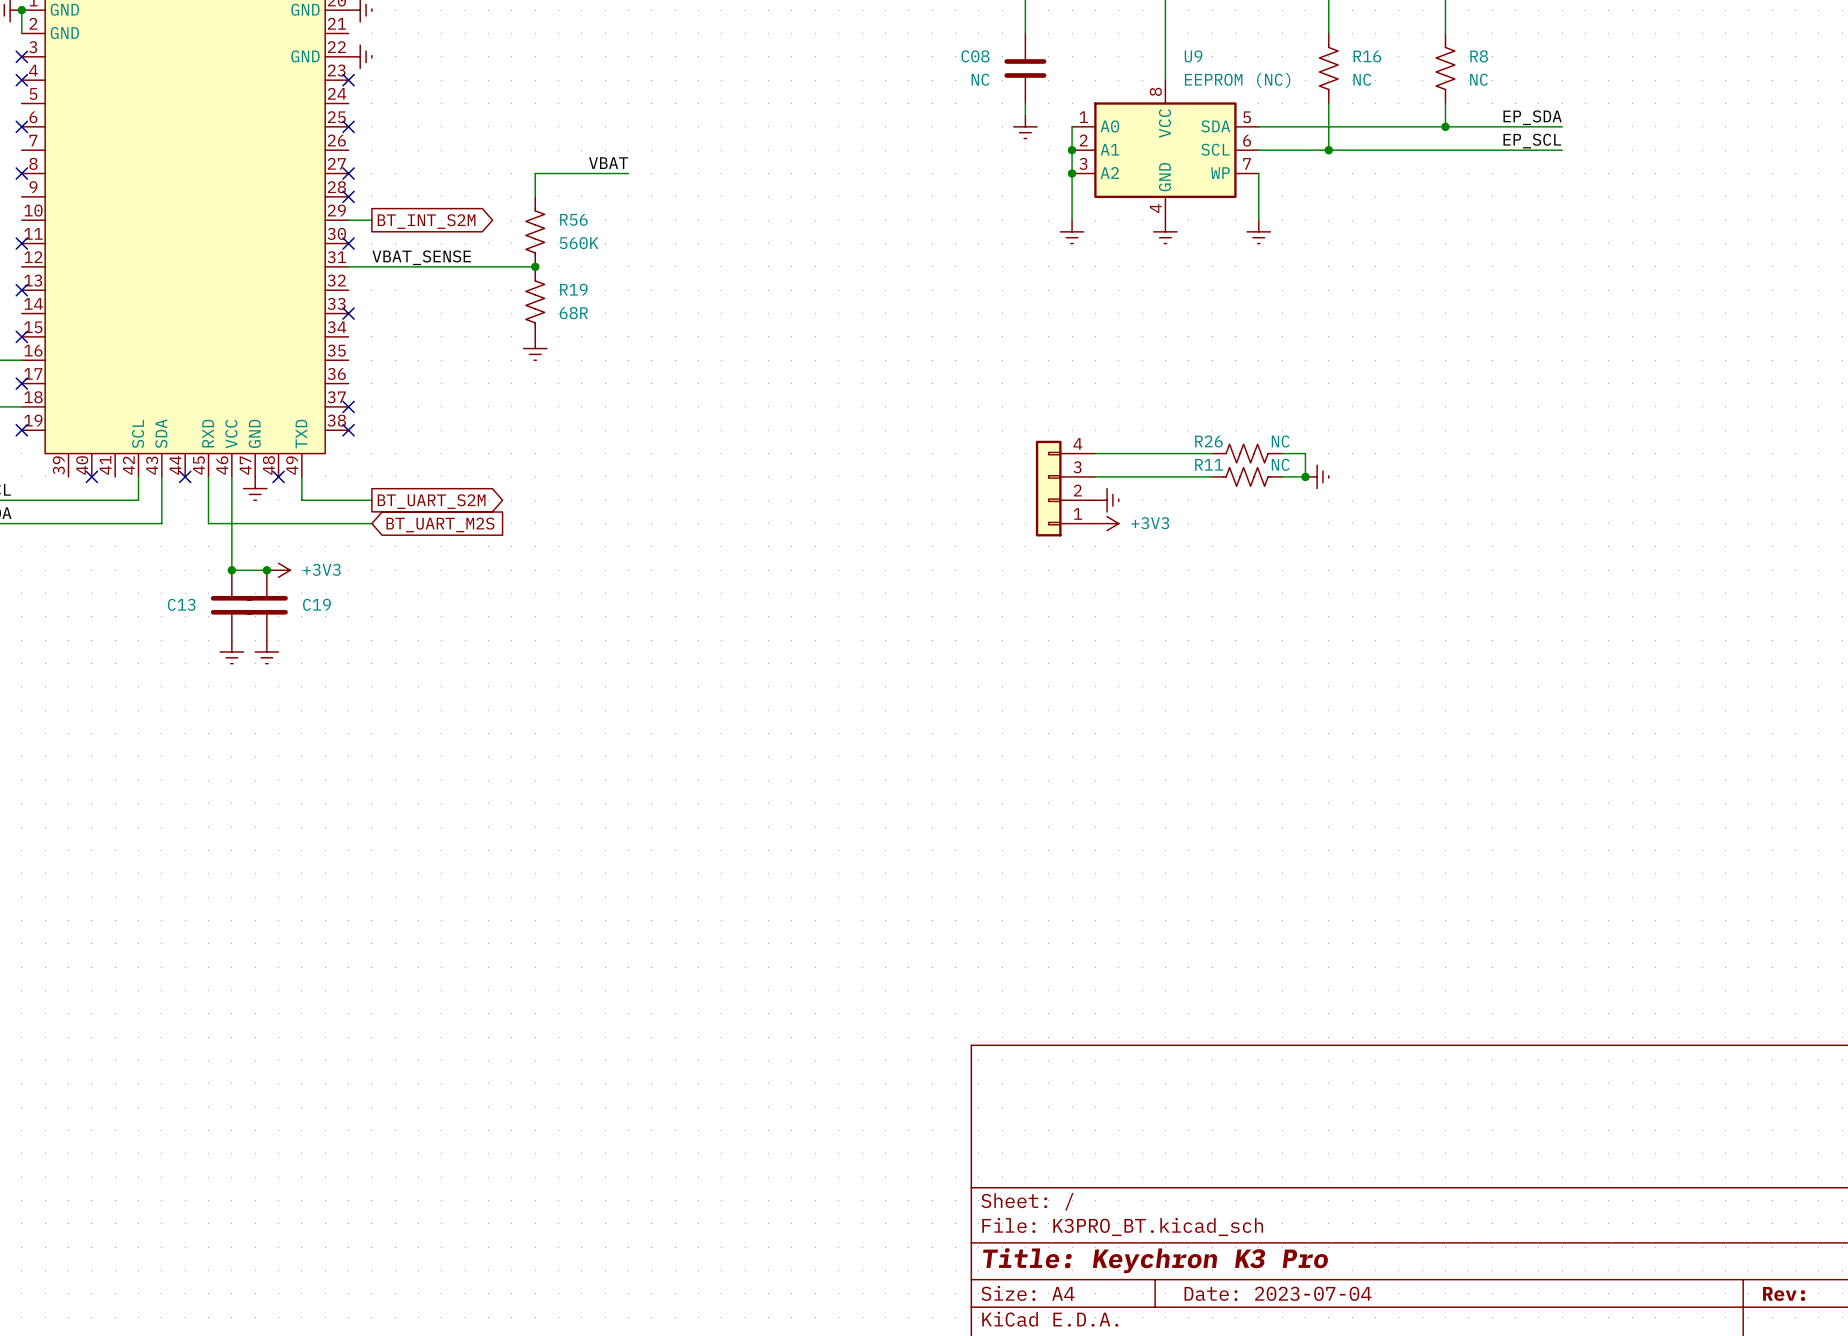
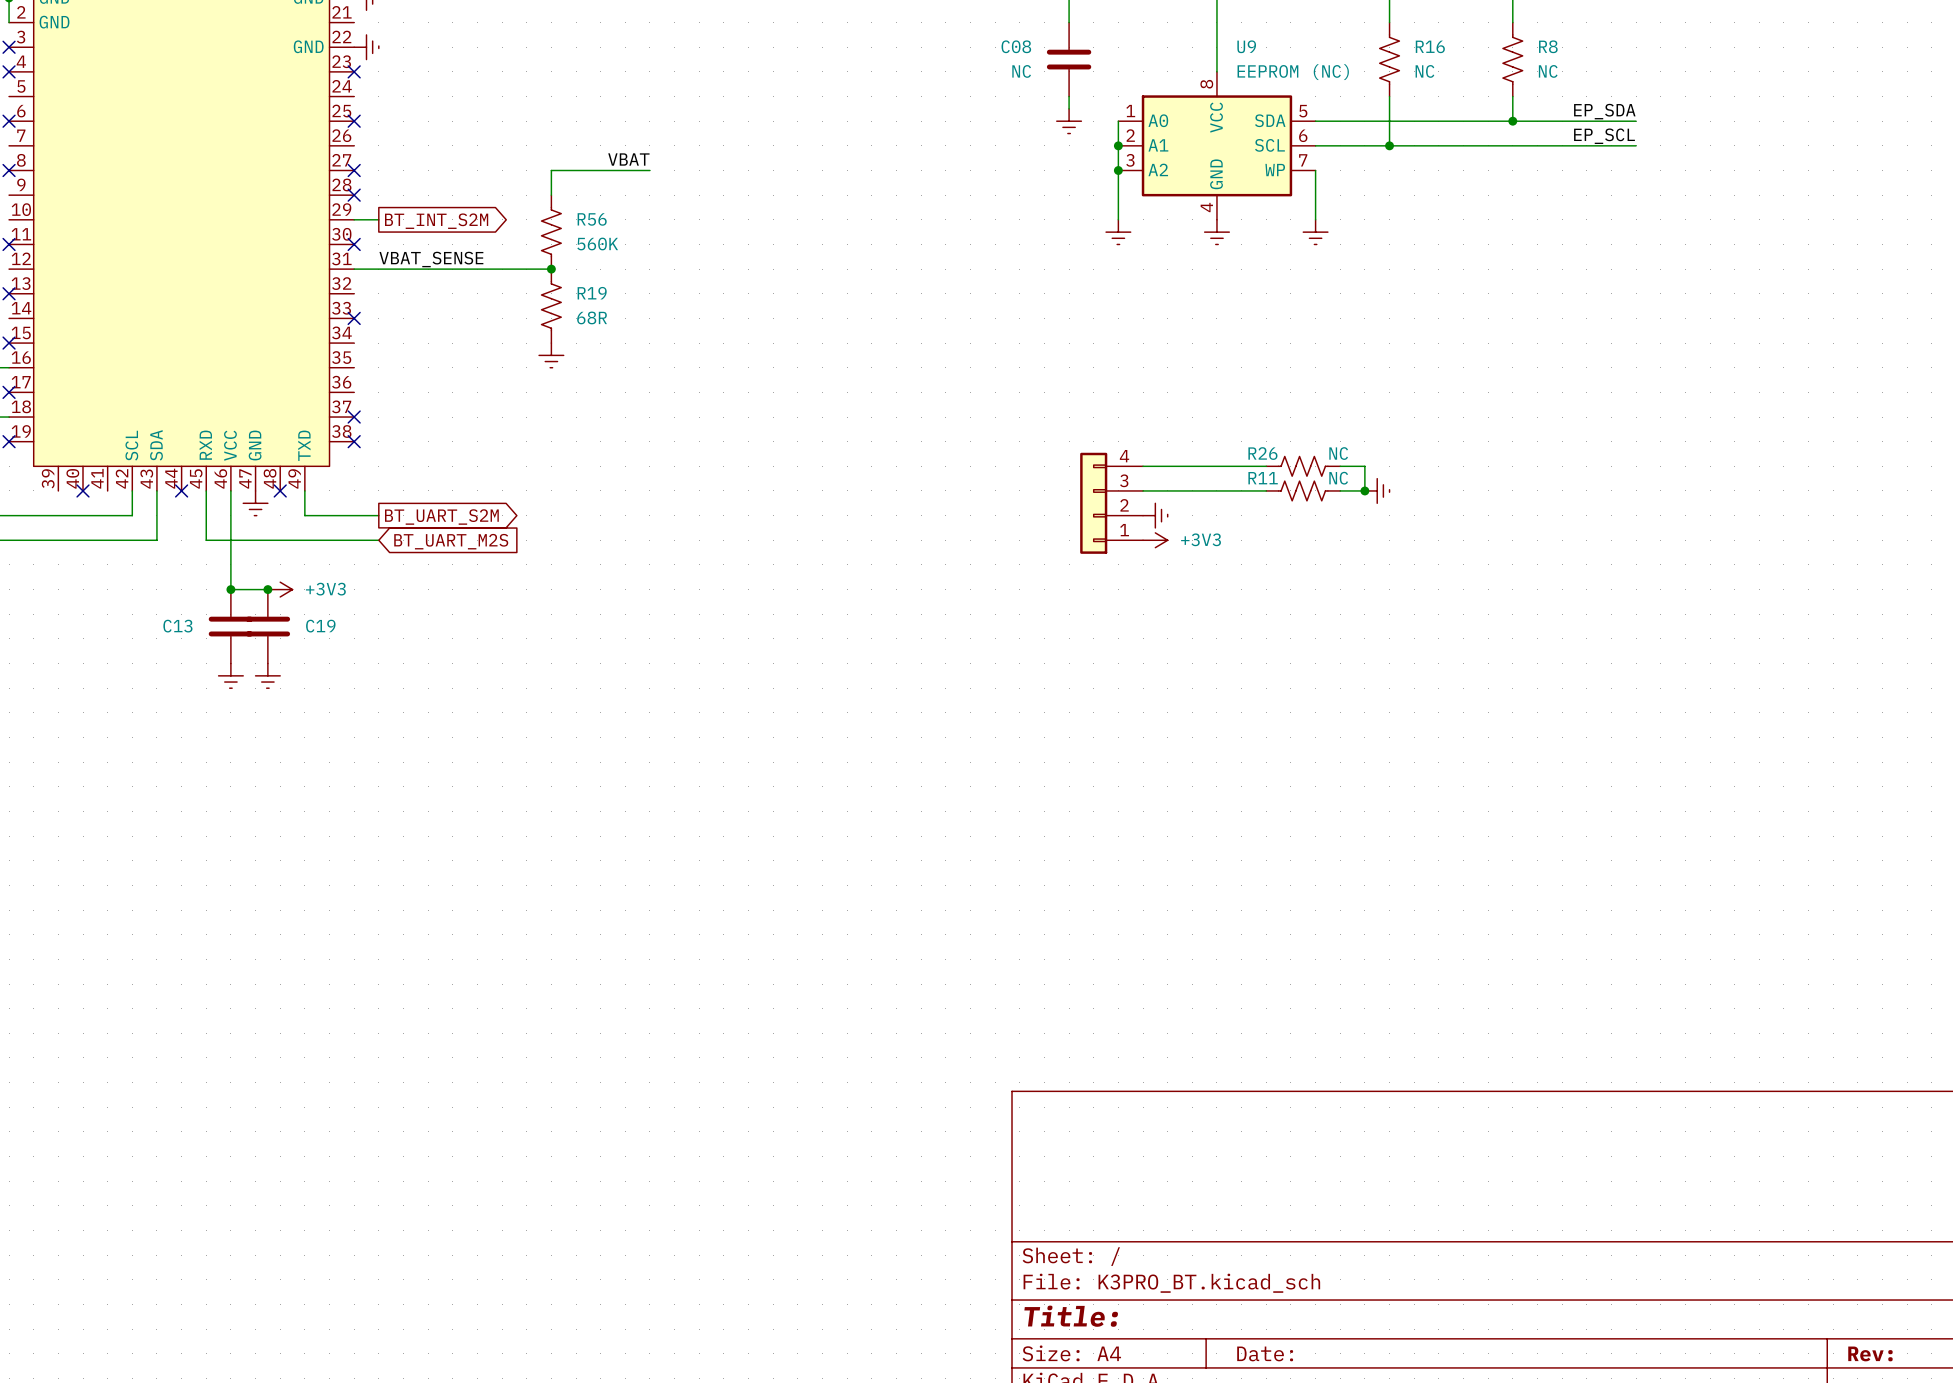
title block: Title: Keychron K3 Pro (1155, 1260) -> Title: (1071, 1316)
title block: Date: 2023-07-04 (1278, 1293) -> Date: (1265, 1353)

